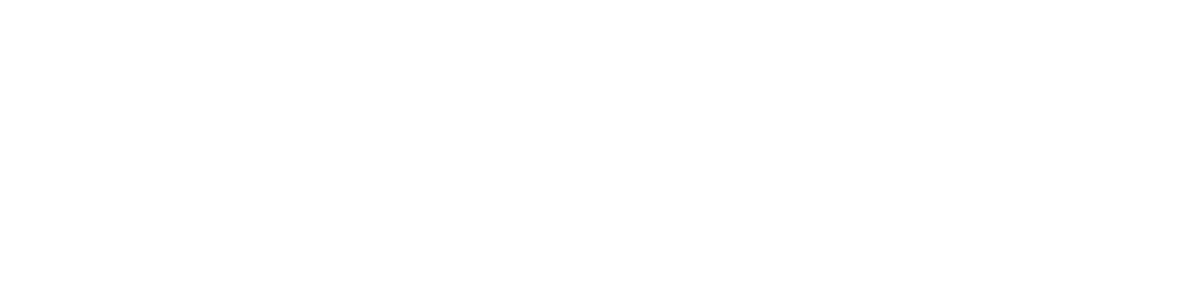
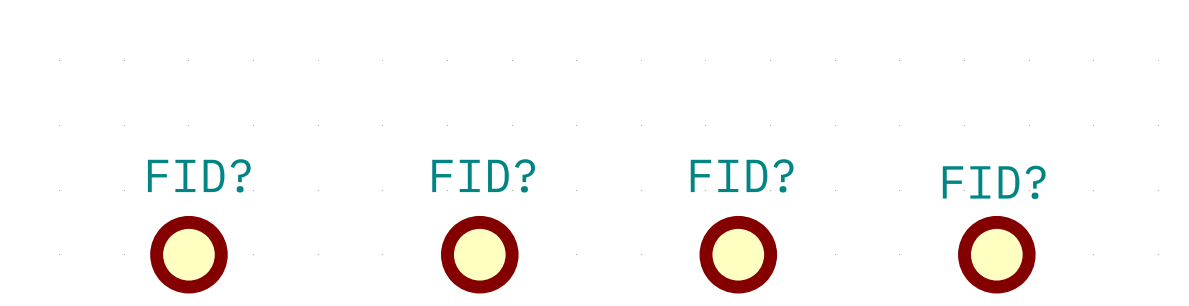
FID?: none -> (188, 254)
FID?: none -> (479, 254)
FID?: none -> (738, 254)
FID?: none -> (996, 254)

